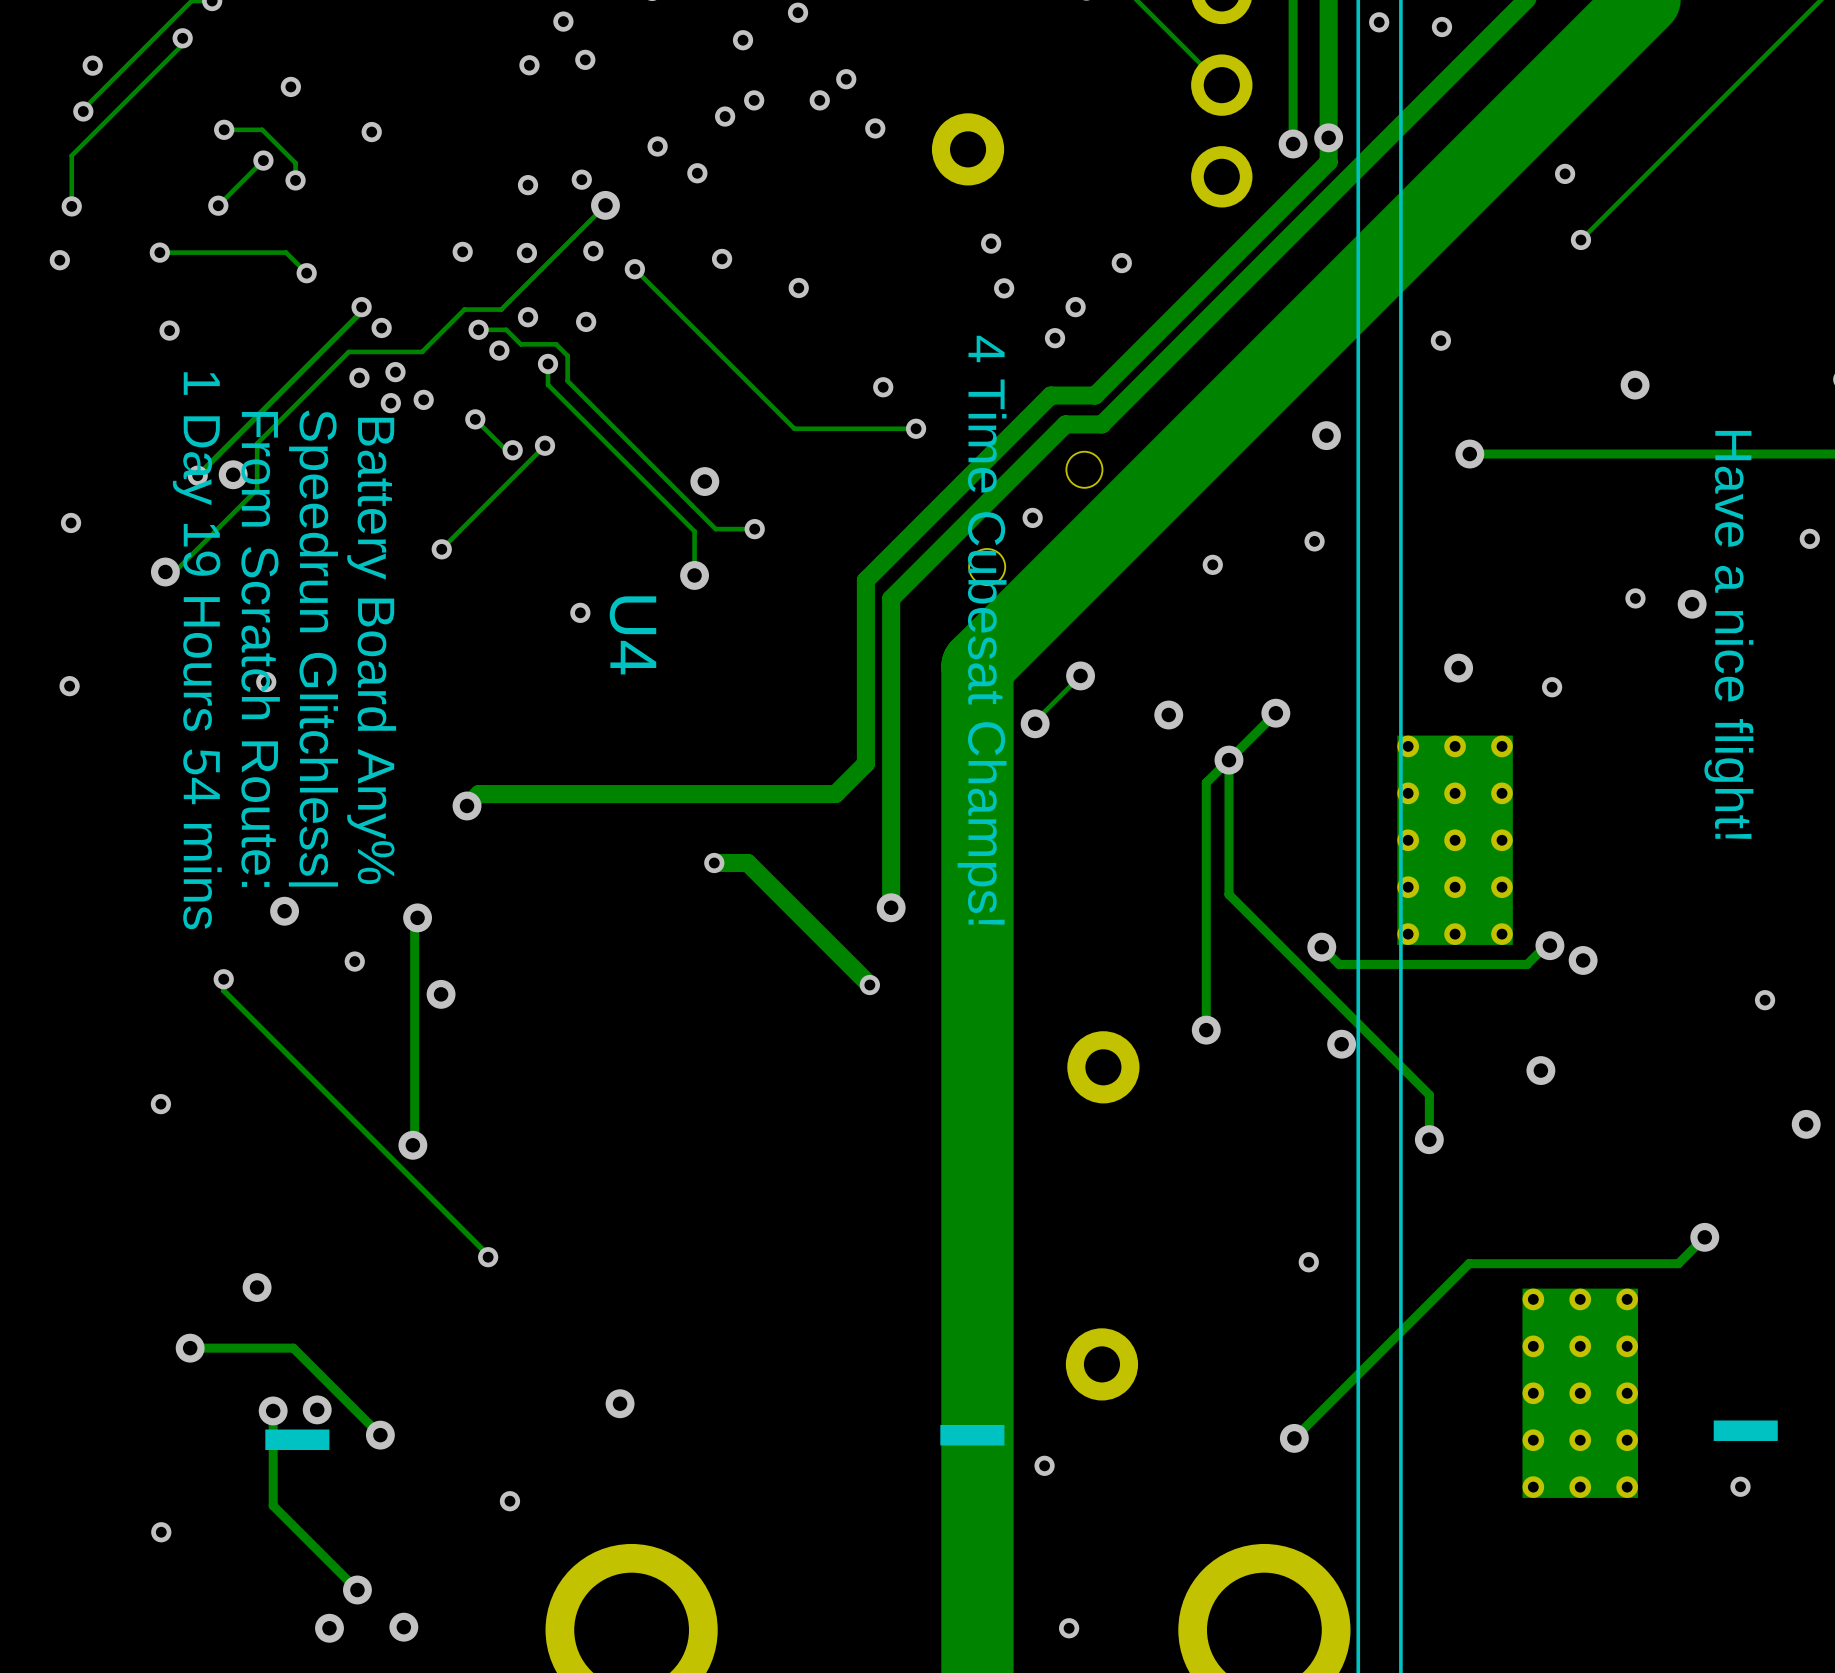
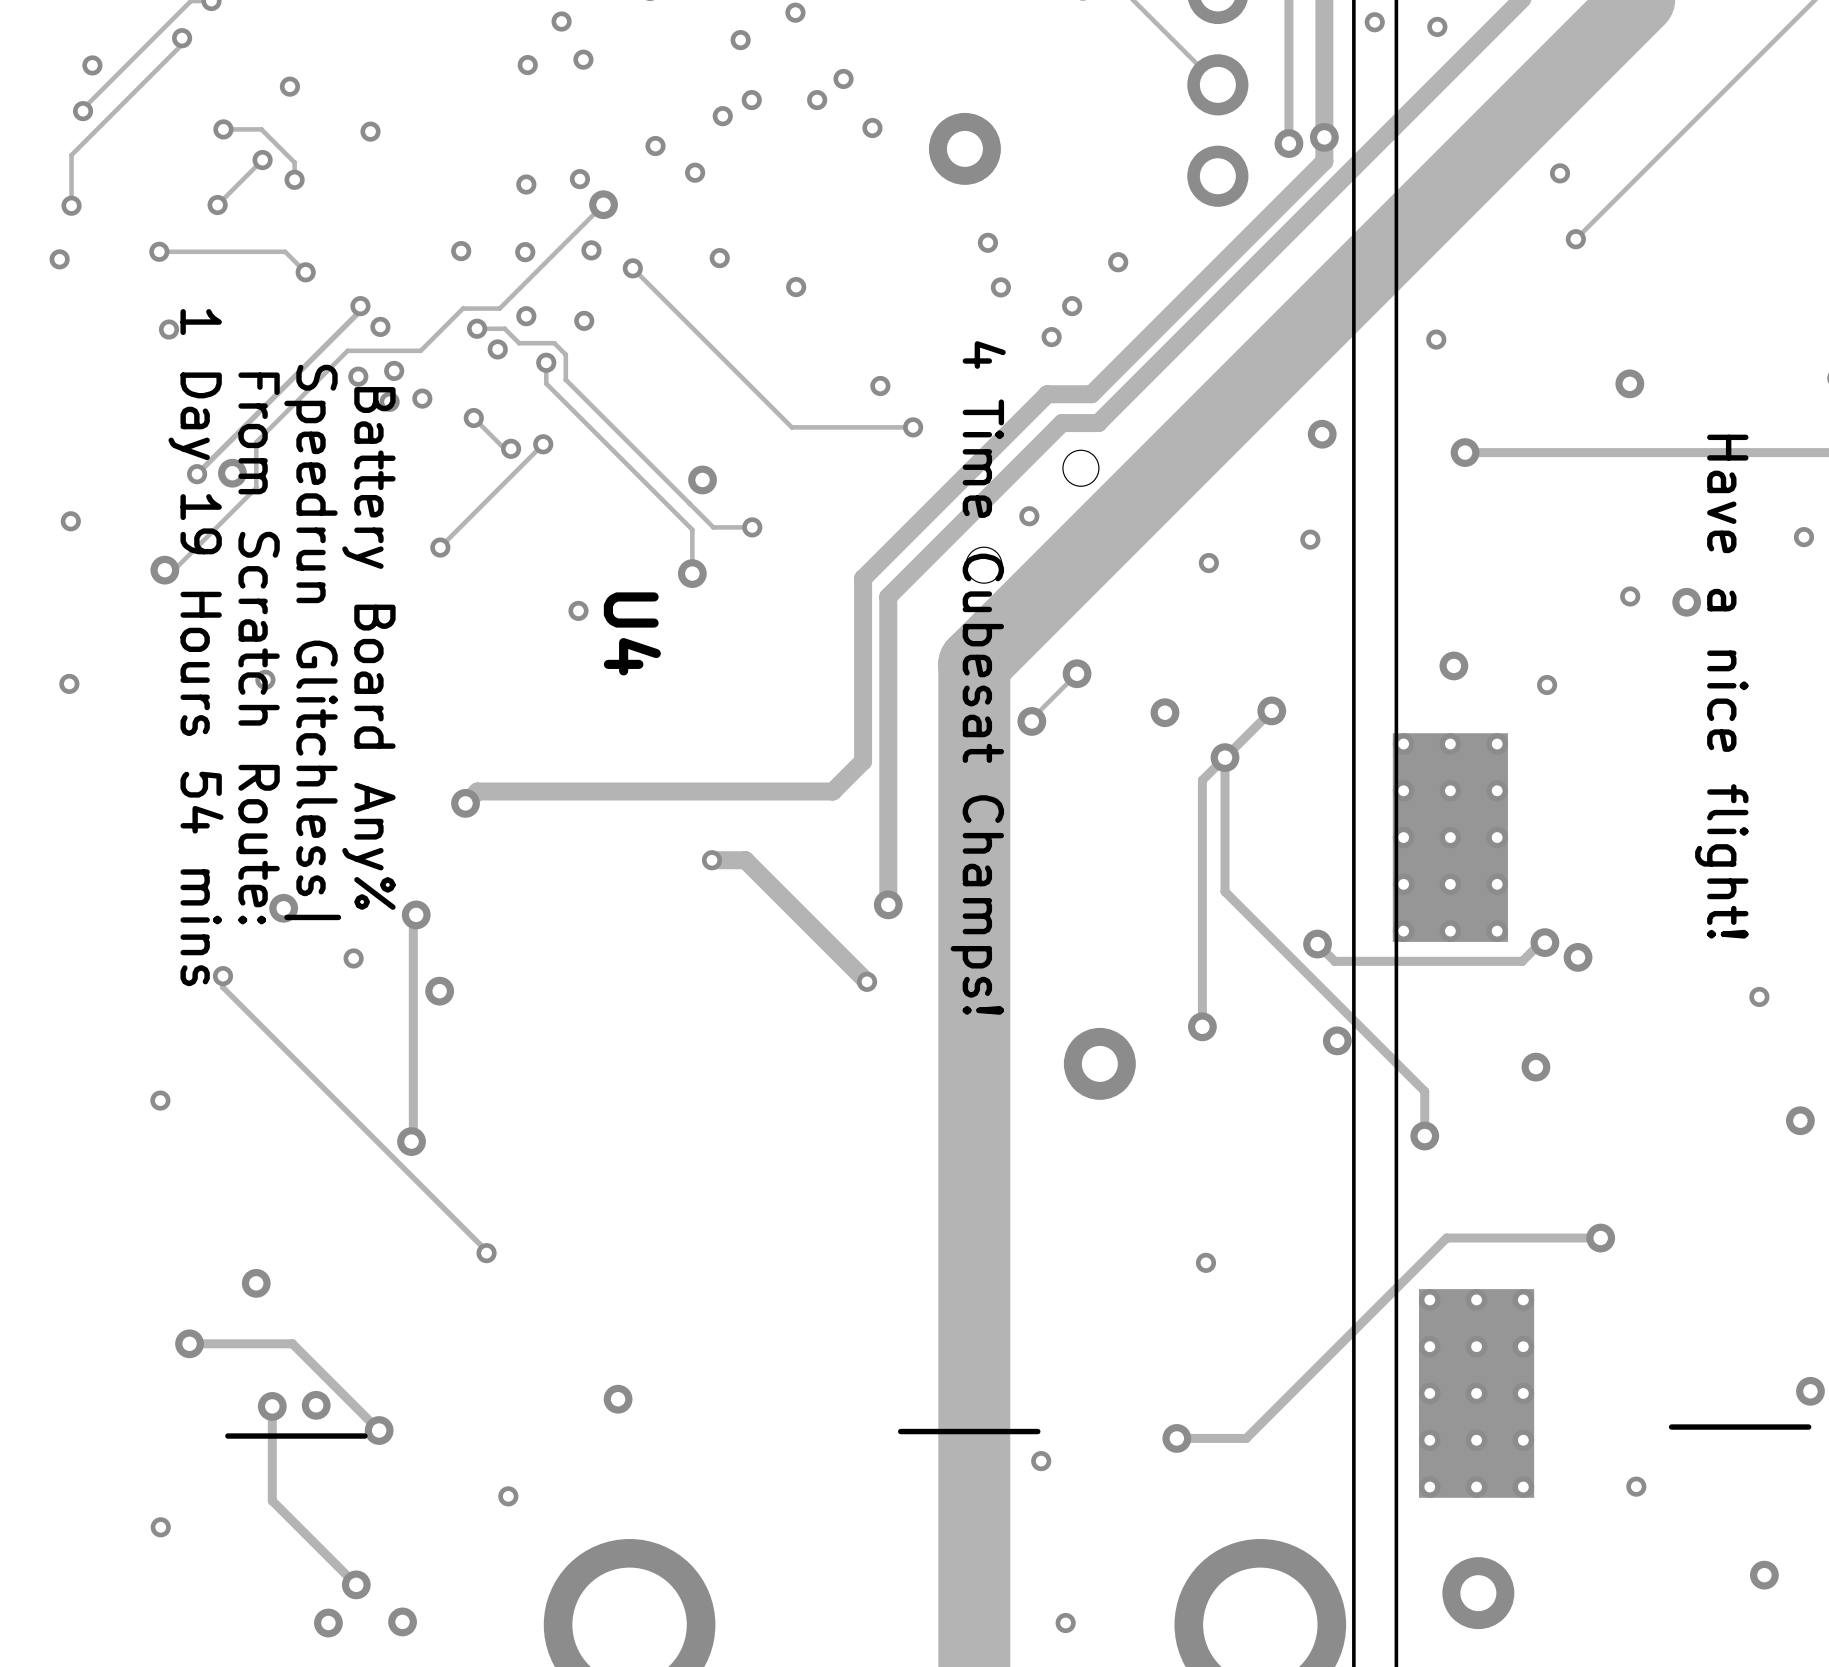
track: (1704, 1237) (1678, 1263) (1469, 1263) (1294, 1438) -> none
via: (1704, 1237) -> none
track: none -> (1600, 1238) (1446, 1238) (1246, 1438) (1176, 1438)
via: none -> (1600, 1238)
via position: (1308, 1262) -> (1205, 1262)
part position: (1101, 1364) -> (1478, 1593)
part position: (1580, 1393) -> (1476, 1393)
via: none -> (1810, 1391)
via position: (1294, 1438) -> (1176, 1438)
via position: (1740, 1486) -> (1636, 1486)
via: none -> (1764, 1575)

